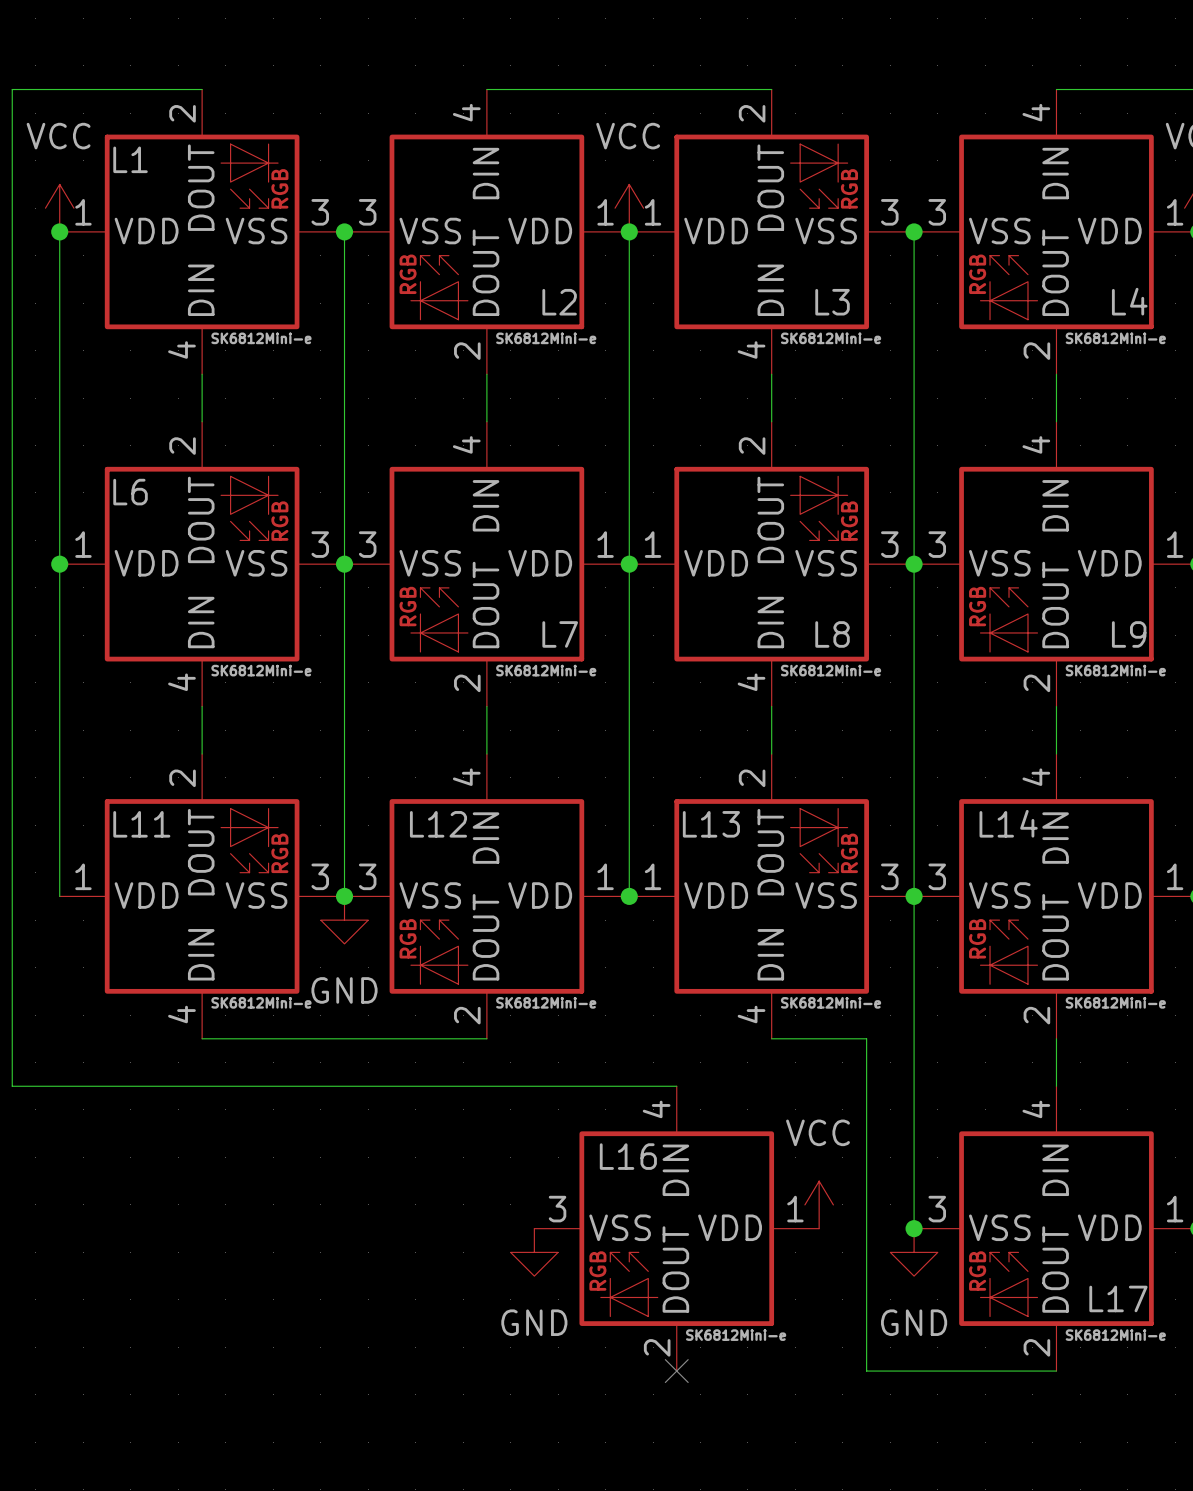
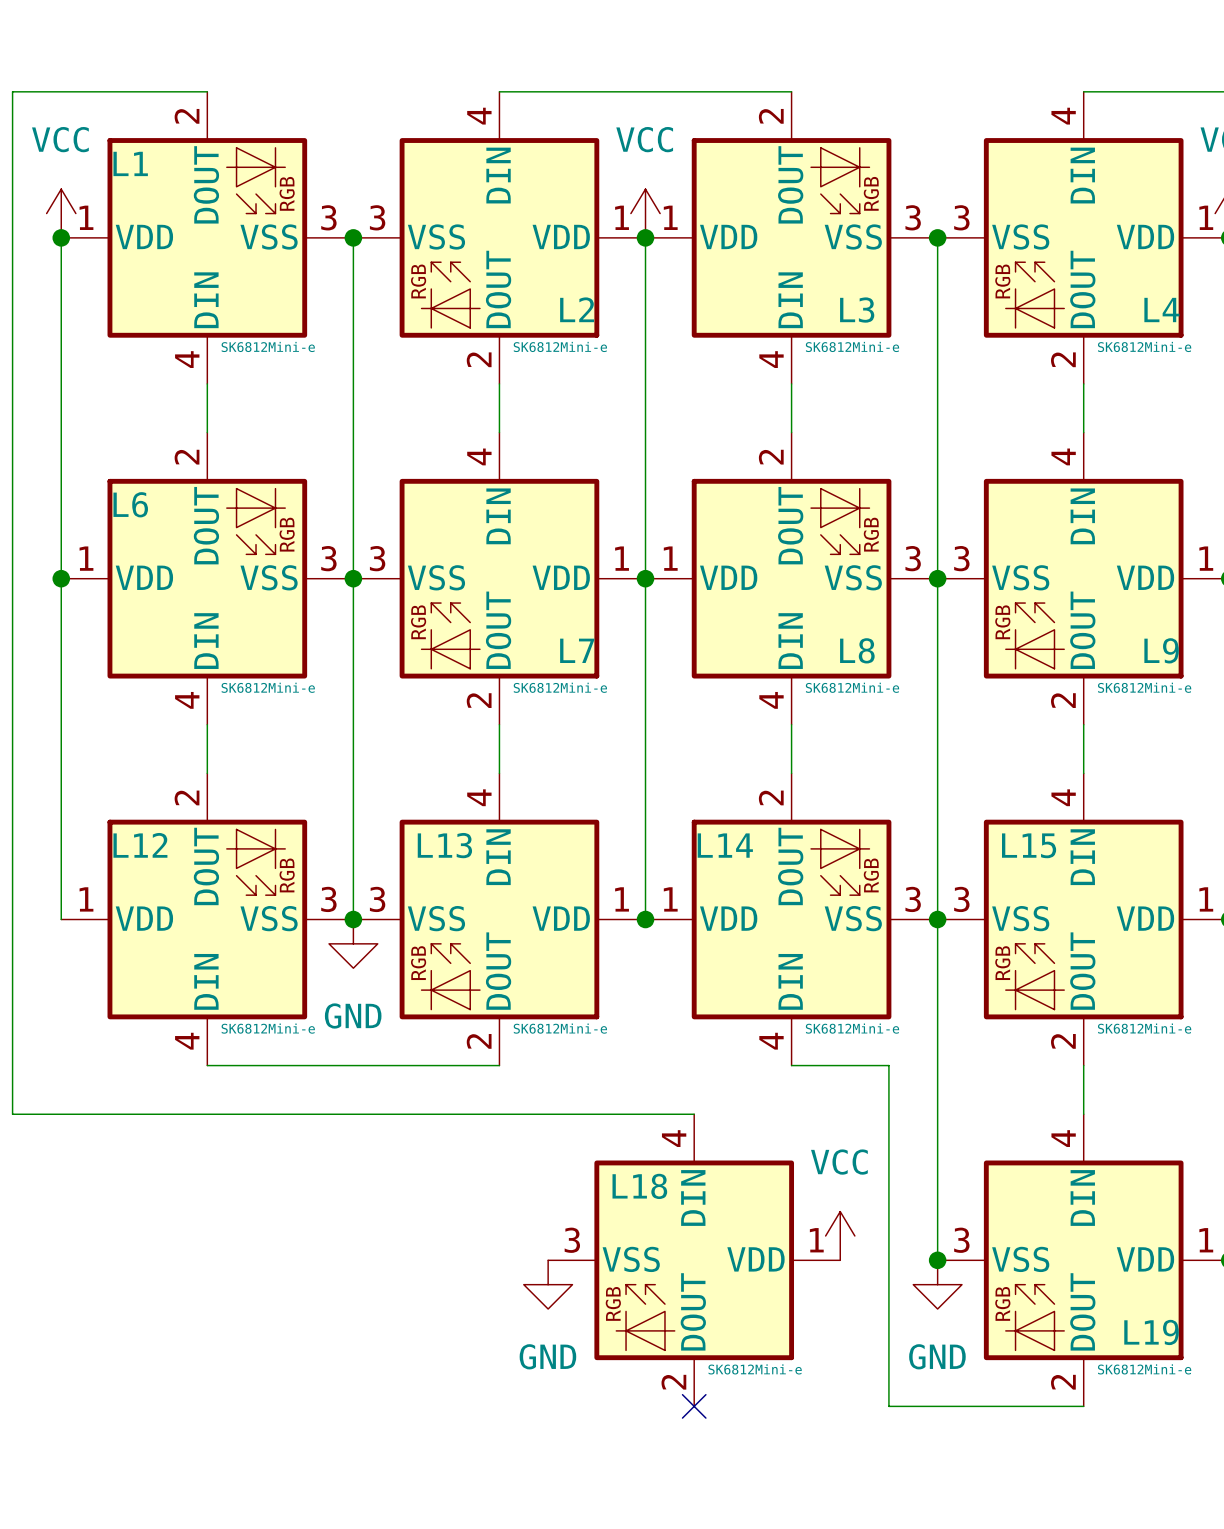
L14 name: L14 (1008, 823) -> L15 (1029, 845)
L11 name: L11 (141, 824) -> L12 (140, 845)
L12 name: L12 (438, 824) -> L13 (444, 845)
L13 name: L13 (711, 824) -> L14 (725, 845)
L16 name: L16 (628, 1156) -> L18 (639, 1186)
L17 name: L17 (1118, 1298) -> L19 (1151, 1332)

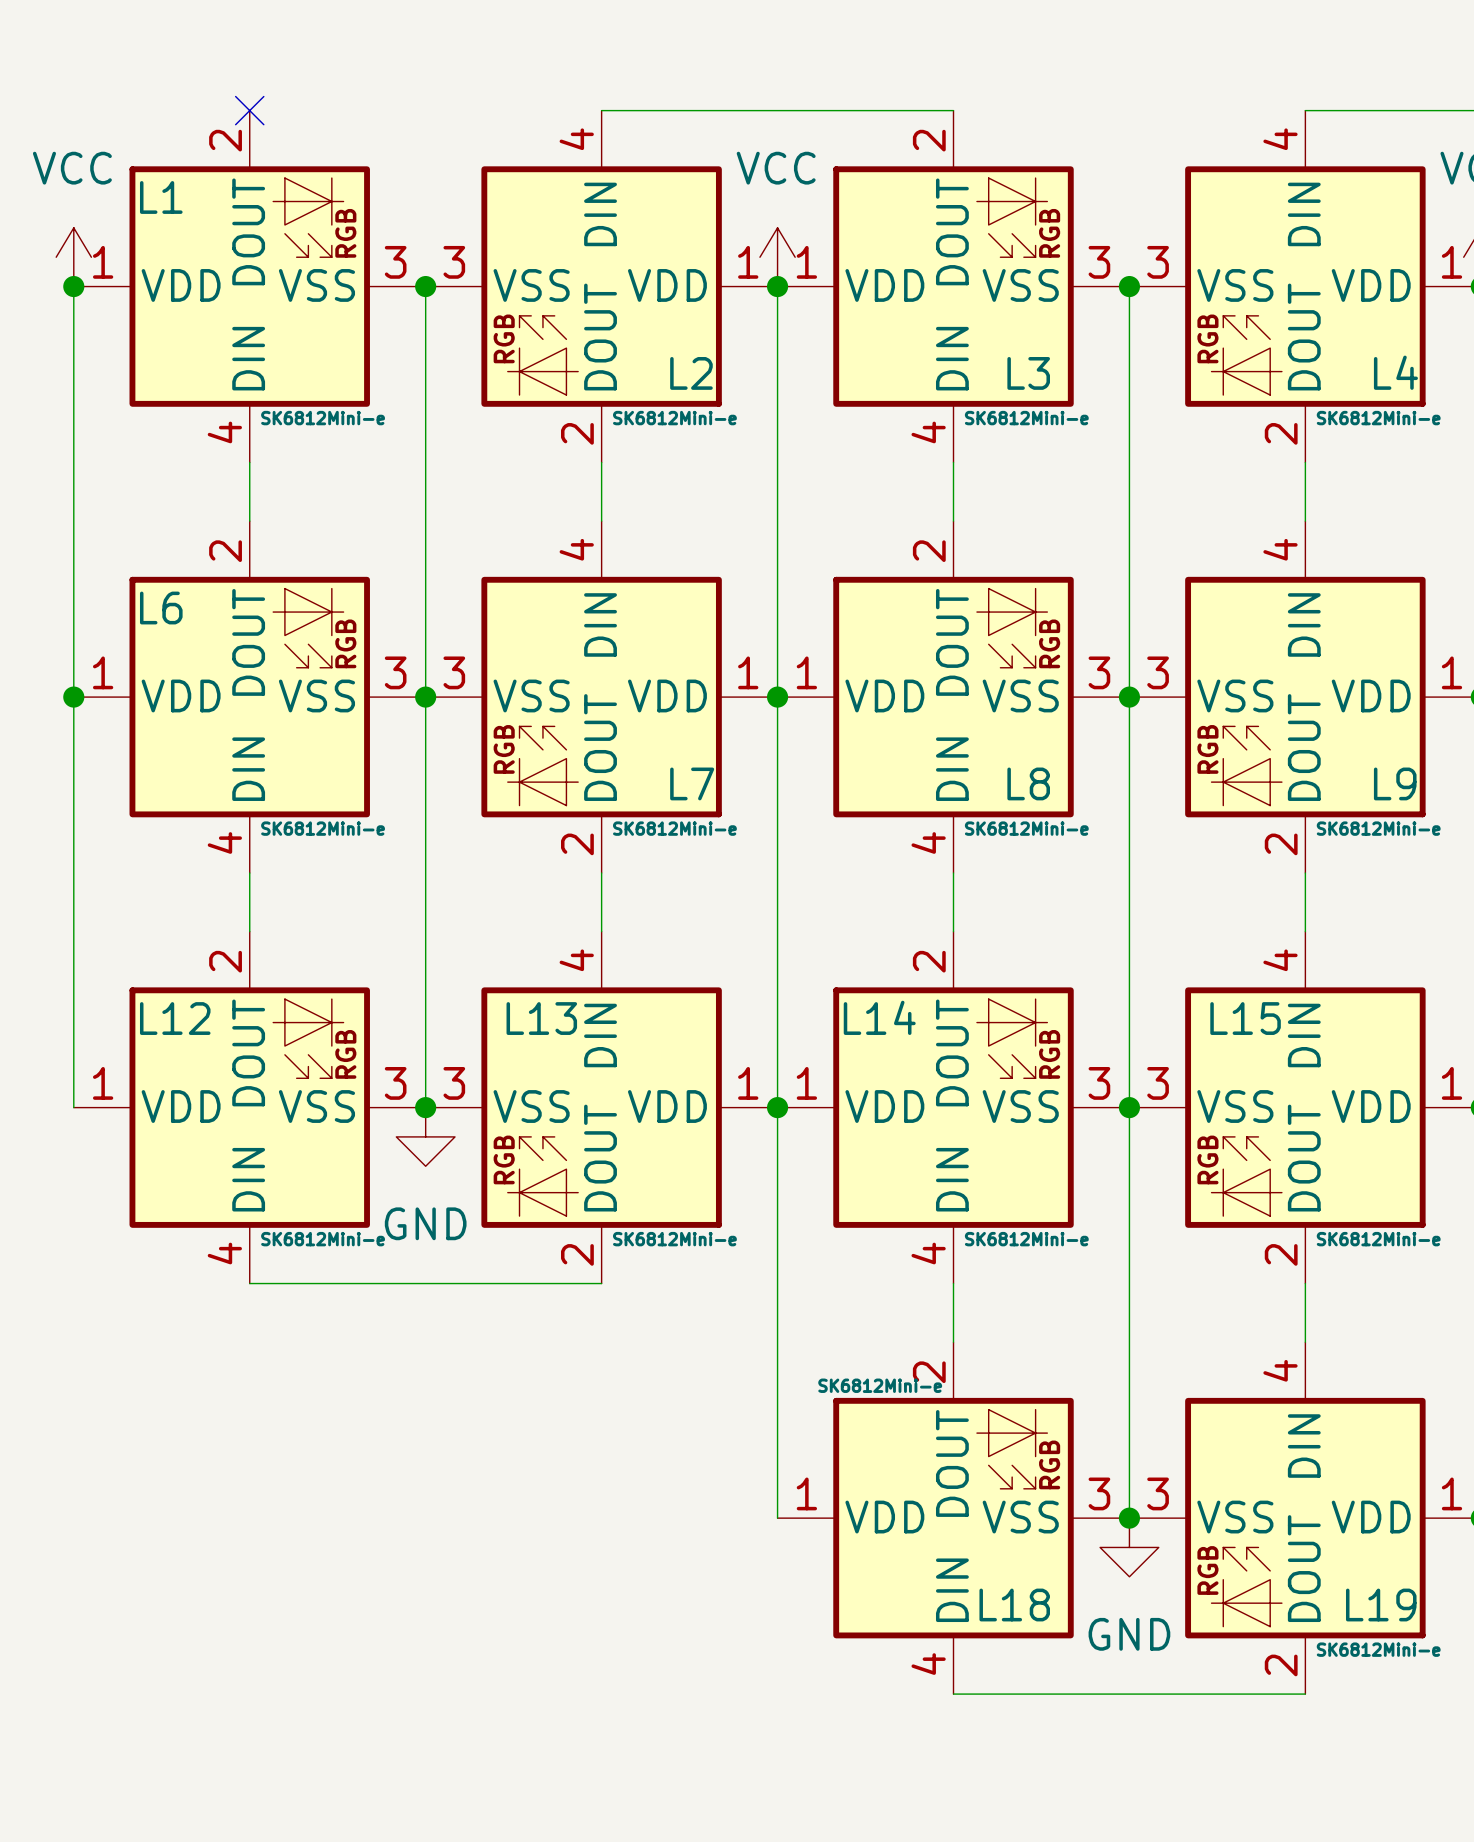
wire: (207, 91) (12, 91) (12, 1114) (694, 1114) -> none
no-connect mark: none -> (249, 110)
wire: none -> (777, 1107) (777, 1518)
wire: (791, 1065) (888, 1065) (888, 1406) -> (953, 1283) (953, 1342)
power symbol: VCC (840, 1235) -> none
L18 rotation: 0° (694, 1260) -> 180° (953, 1518)
power symbol: GND (548, 1284) -> none
no-connect mark: (694, 1406) -> none
wire: none -> (953, 1694) (1070, 1694)

